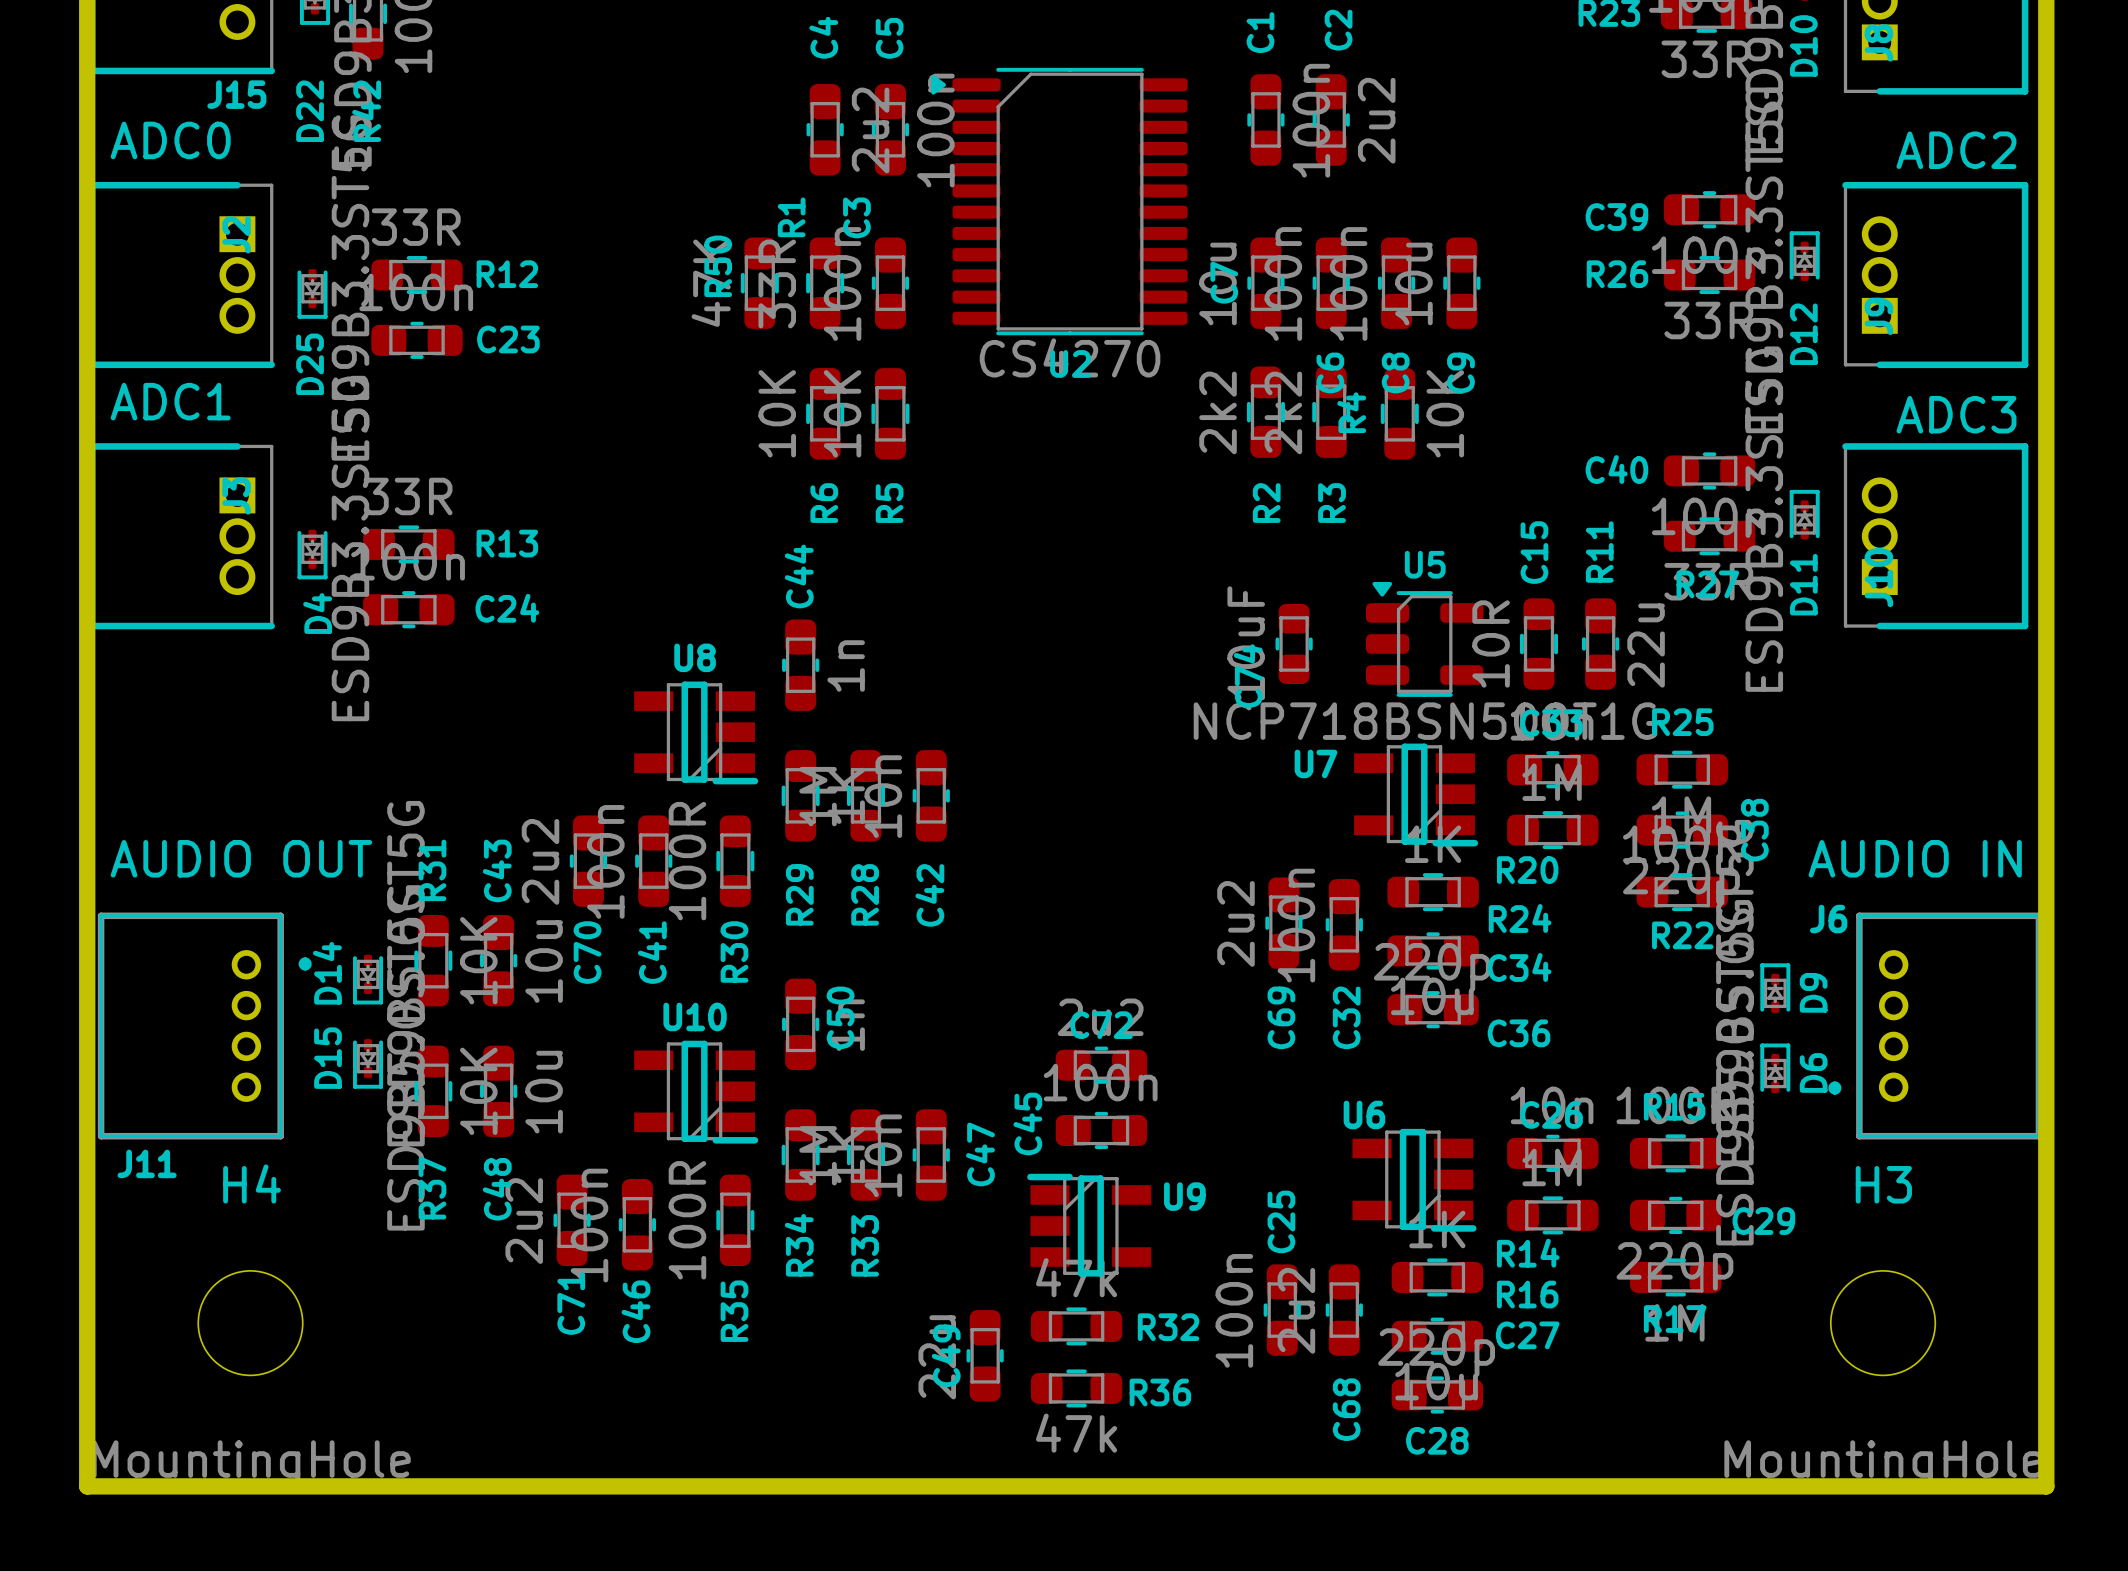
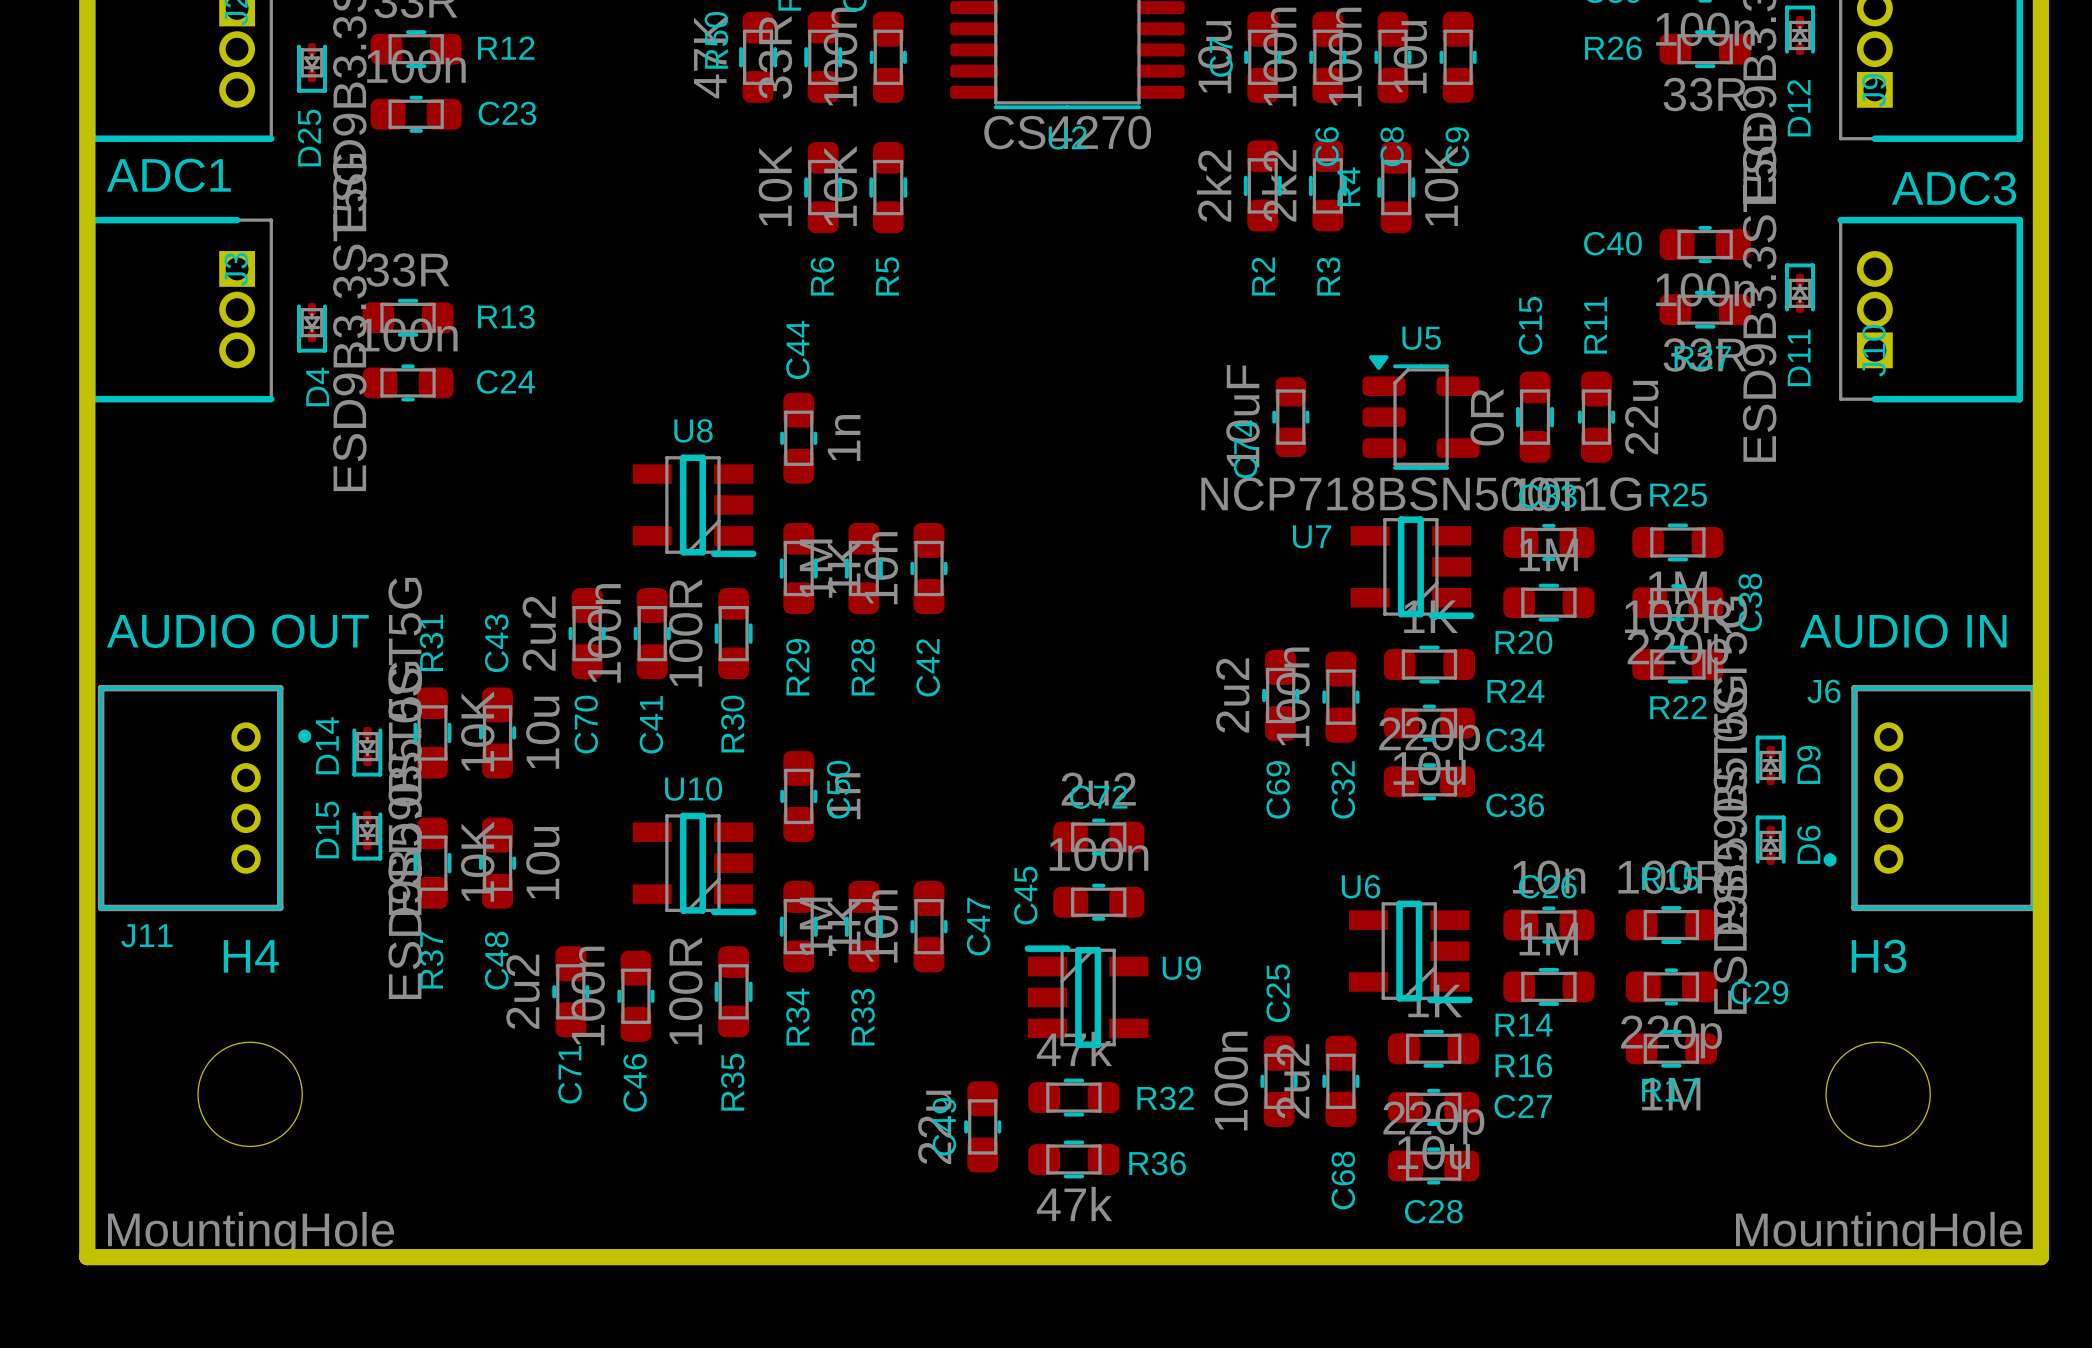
R11 value: 10R (1491, 643) -> 0R (1487, 417)

